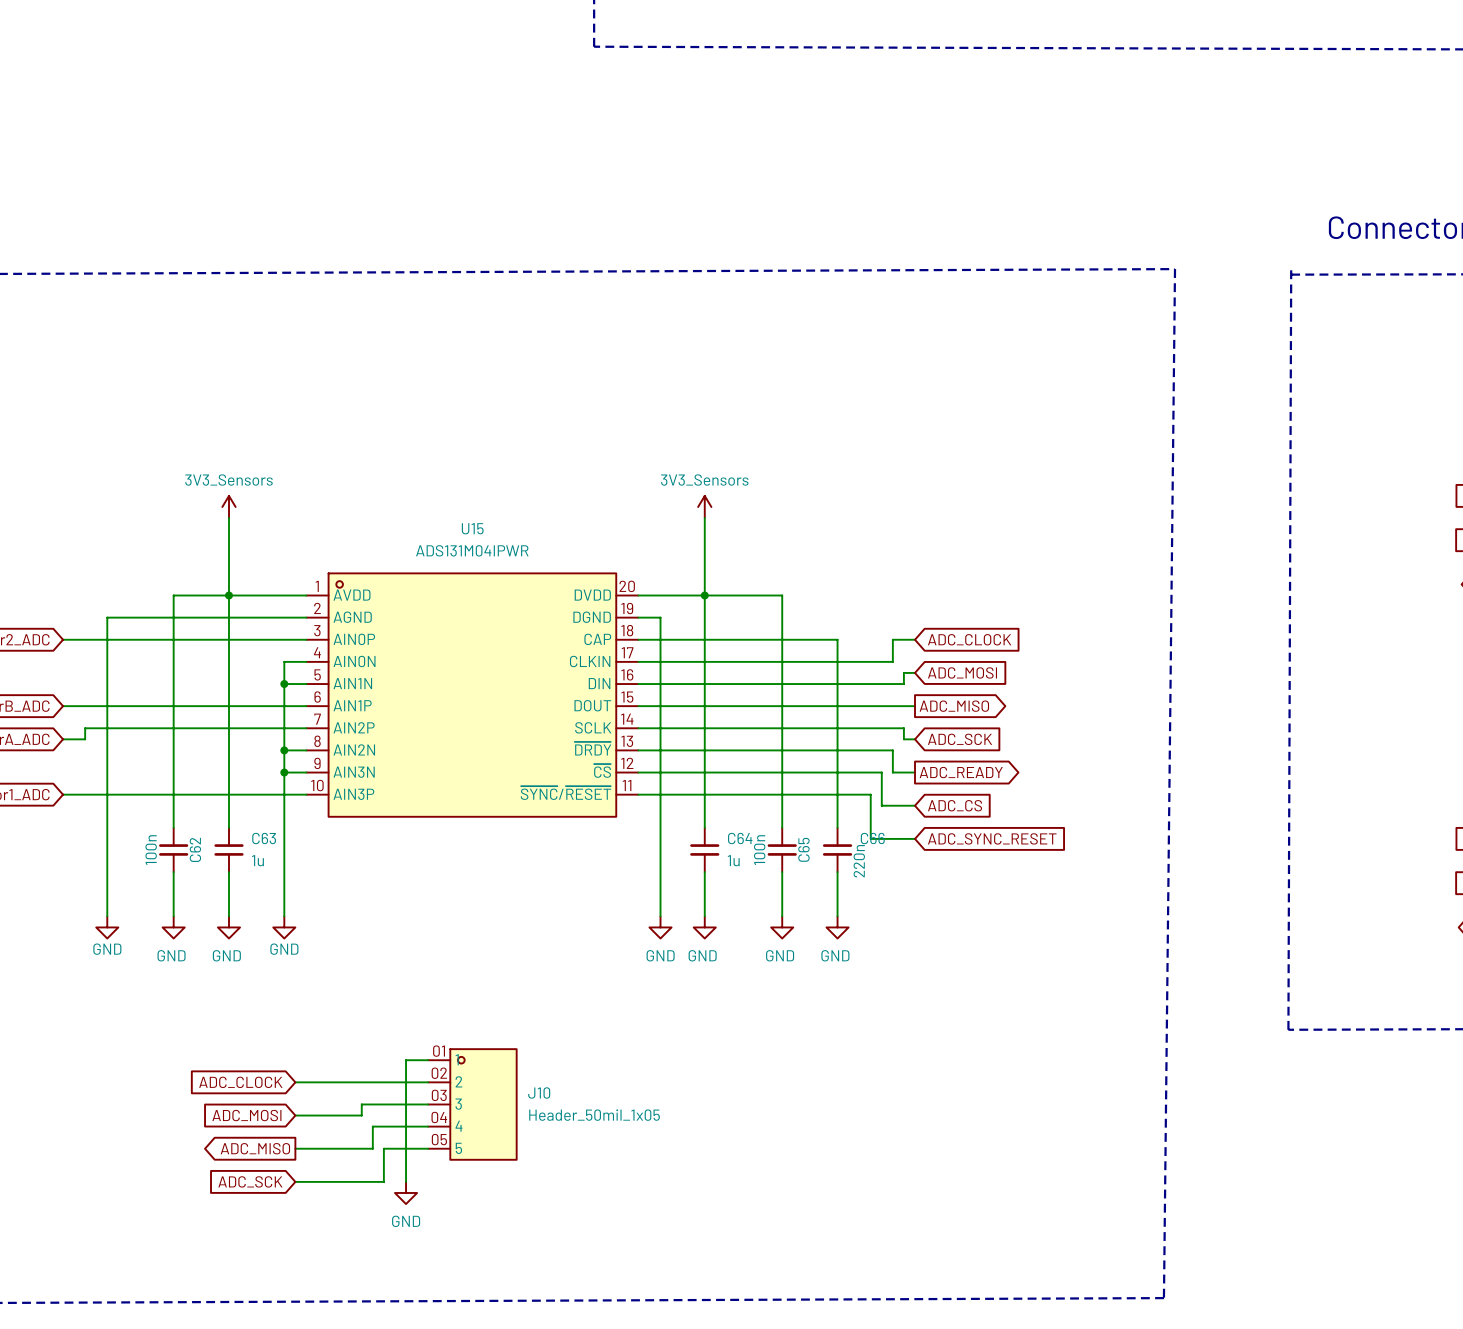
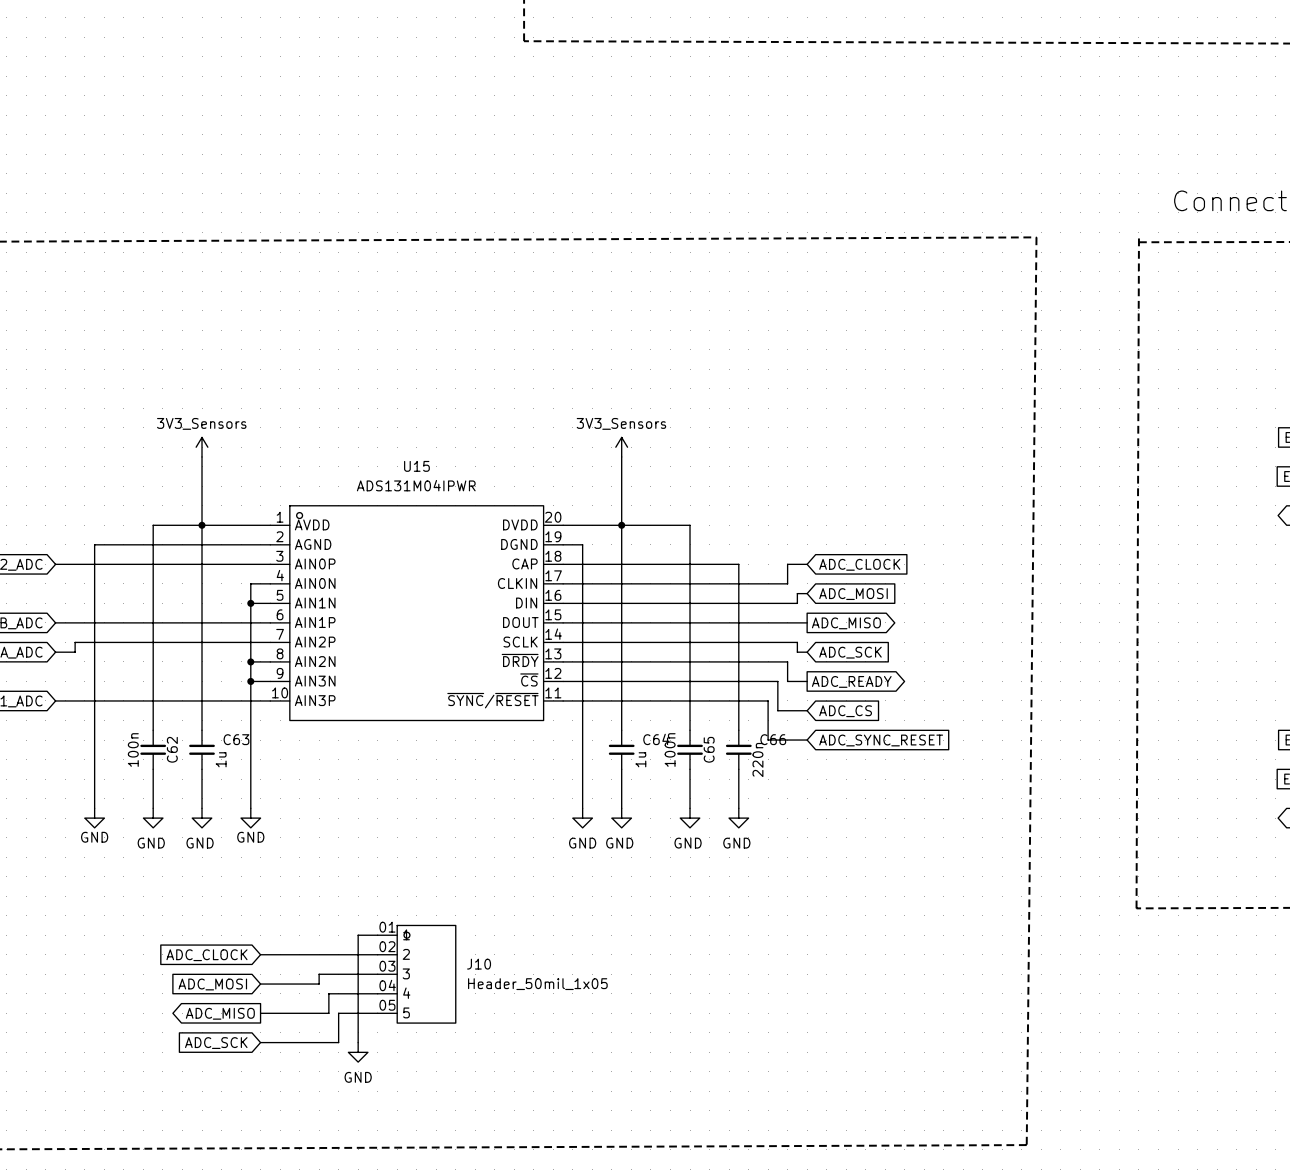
C63 value rotation: 0° (257, 860) -> 90° counterclockwise (221, 759)
C64 value rotation: 0° (733, 860) -> 90° counterclockwise (640, 759)

